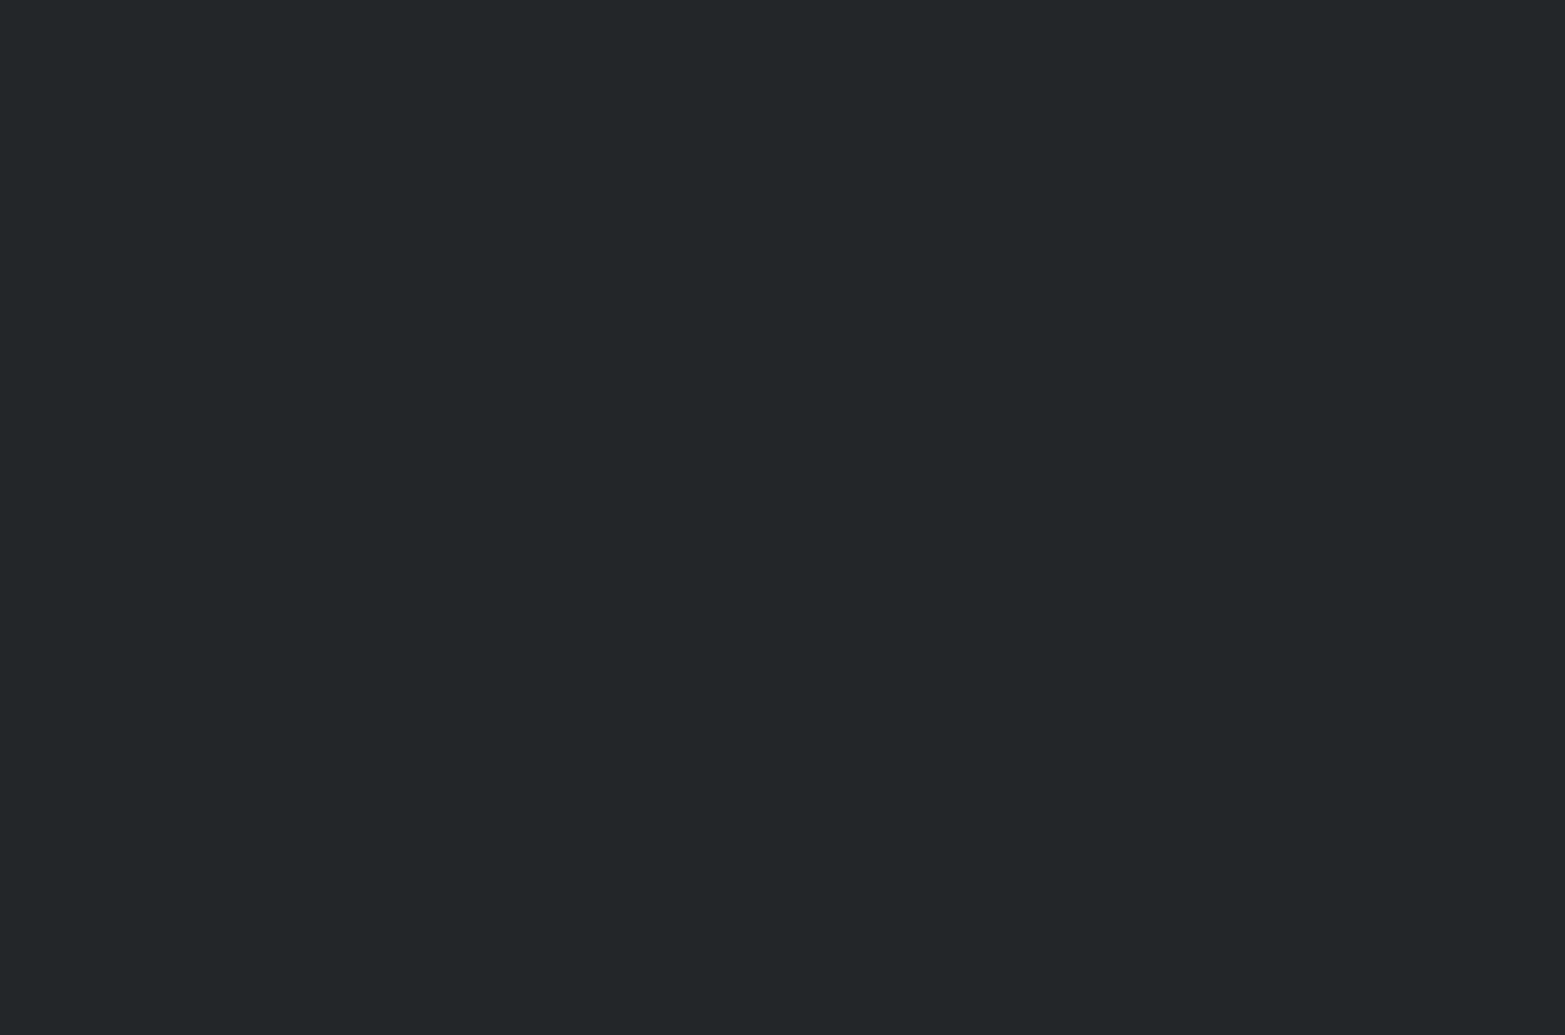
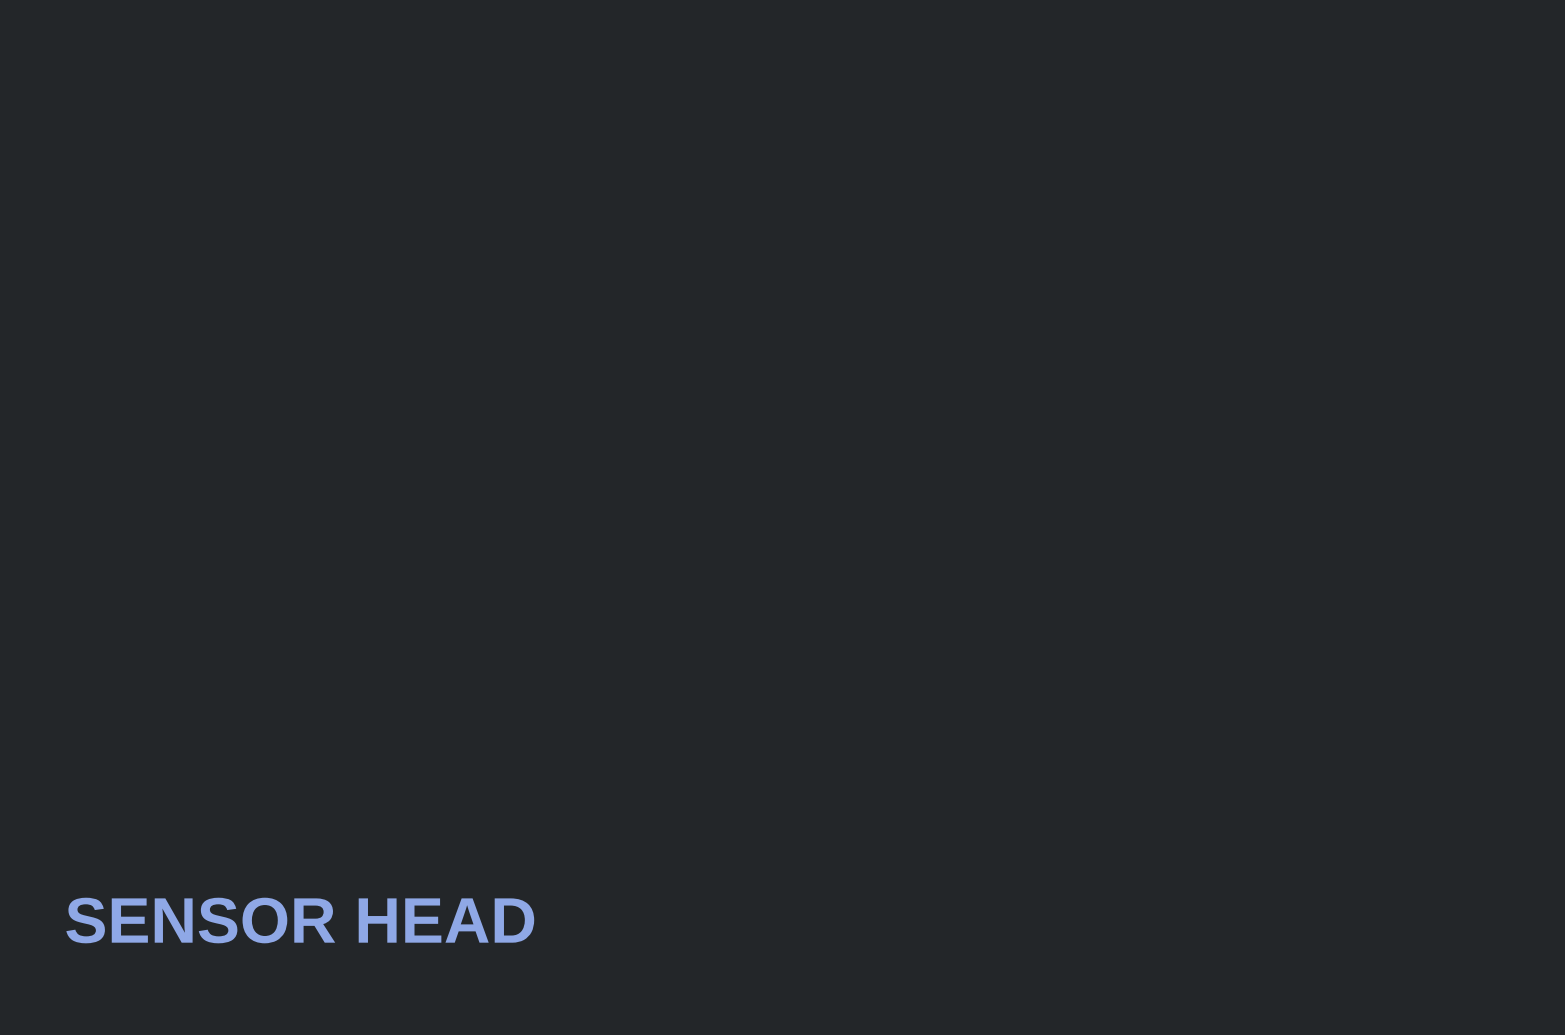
text: none -> SENSOR HEAD (300, 920)

